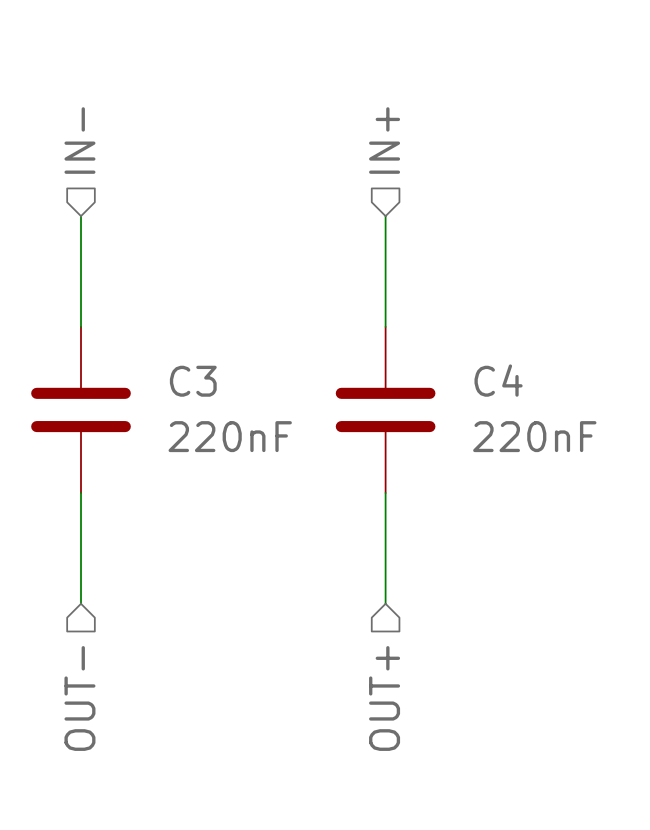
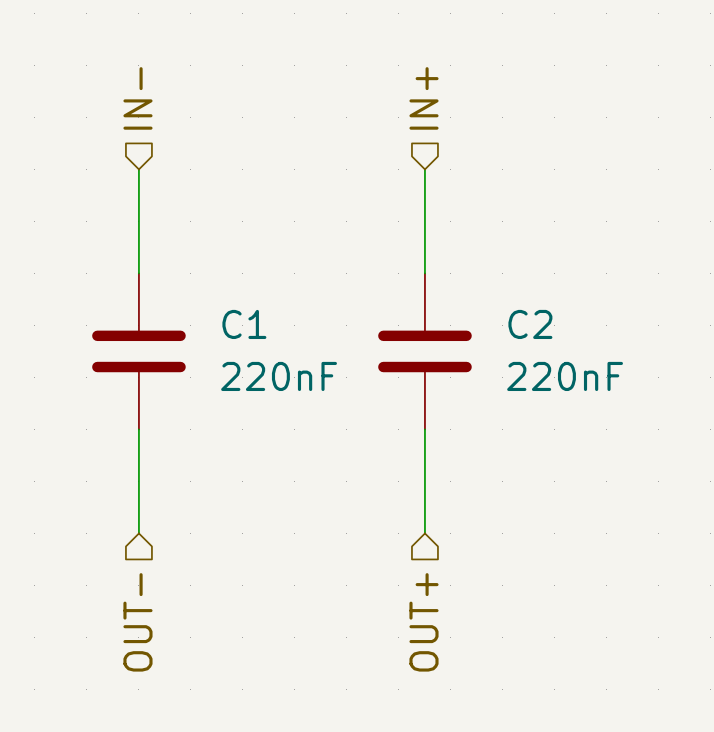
C4 name: C4 (498, 380) -> C2 (530, 324)
C3 name: C3 (193, 381) -> C1 (244, 324)

